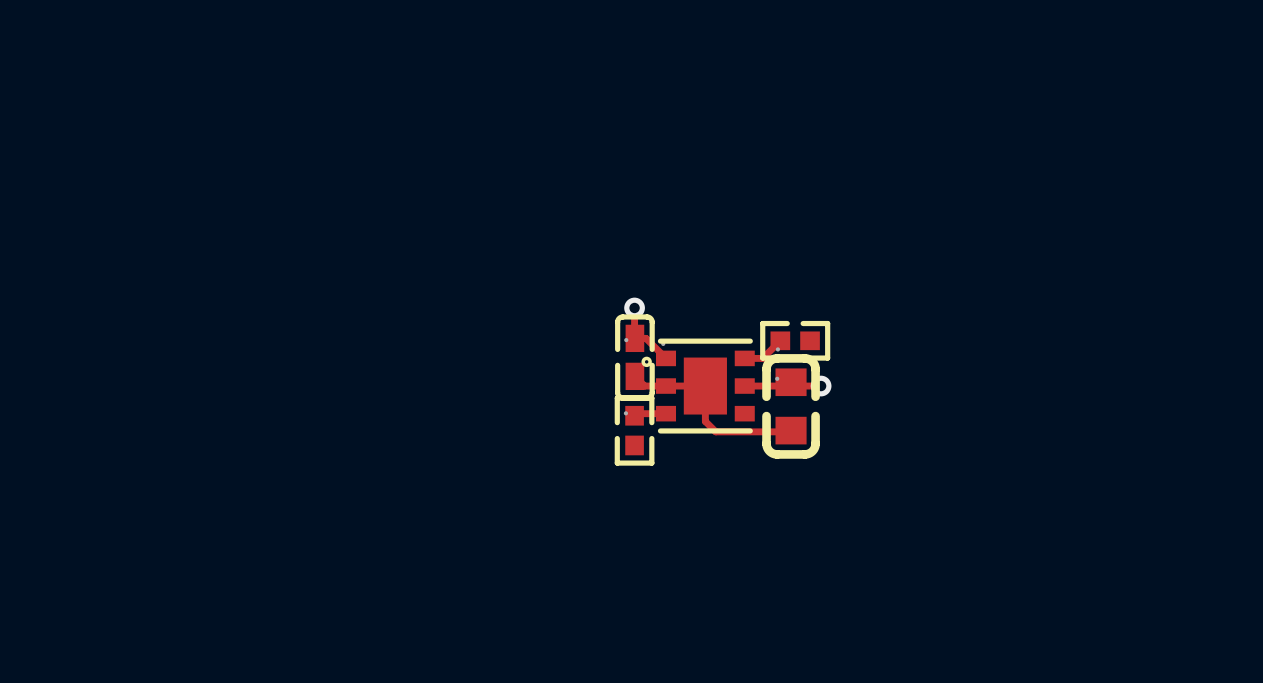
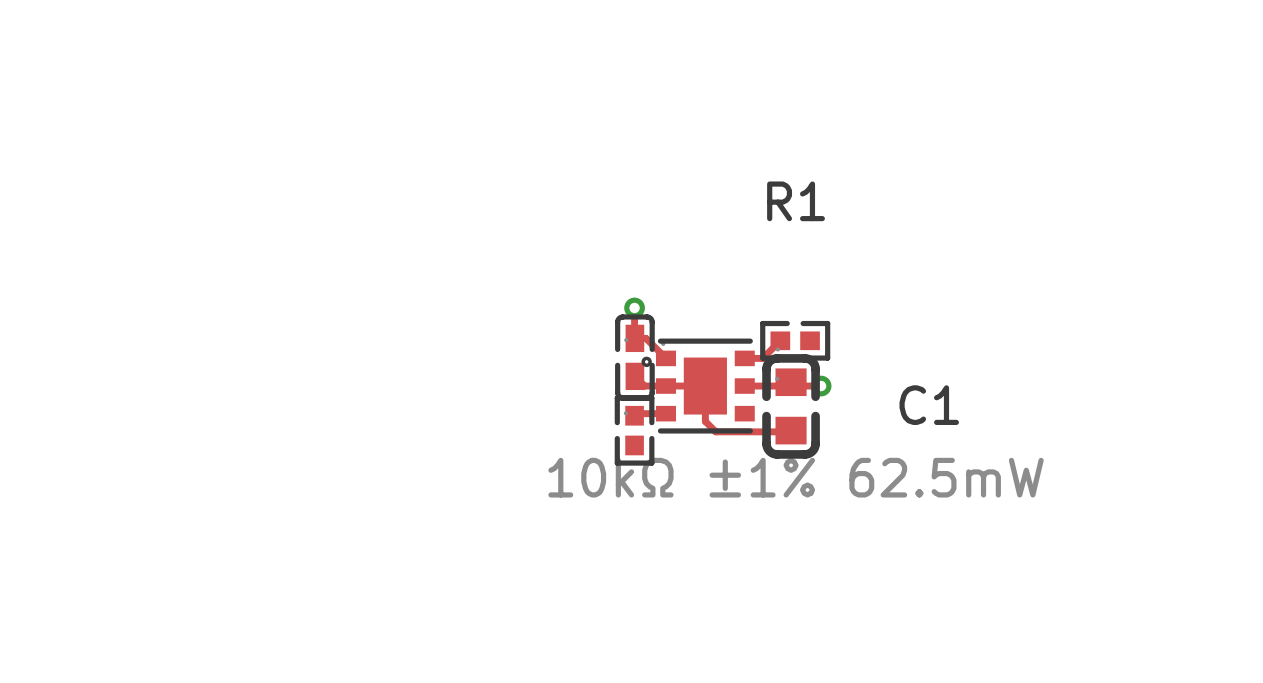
R1 name: none -> R1 (796, 201)
C1 name: none -> C1 (929, 405)
R1 value: none -> 10kΩ ±1% 62.5mW (796, 477)

